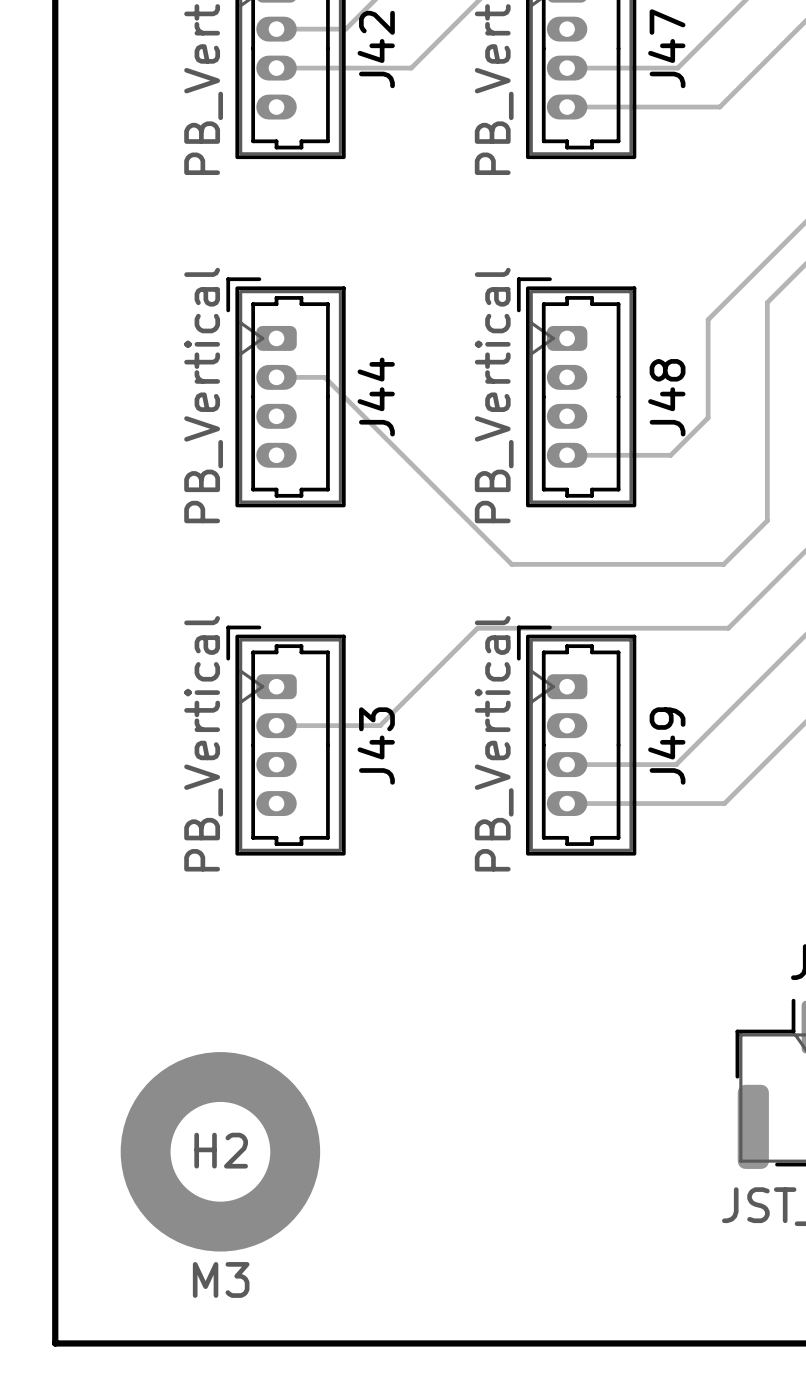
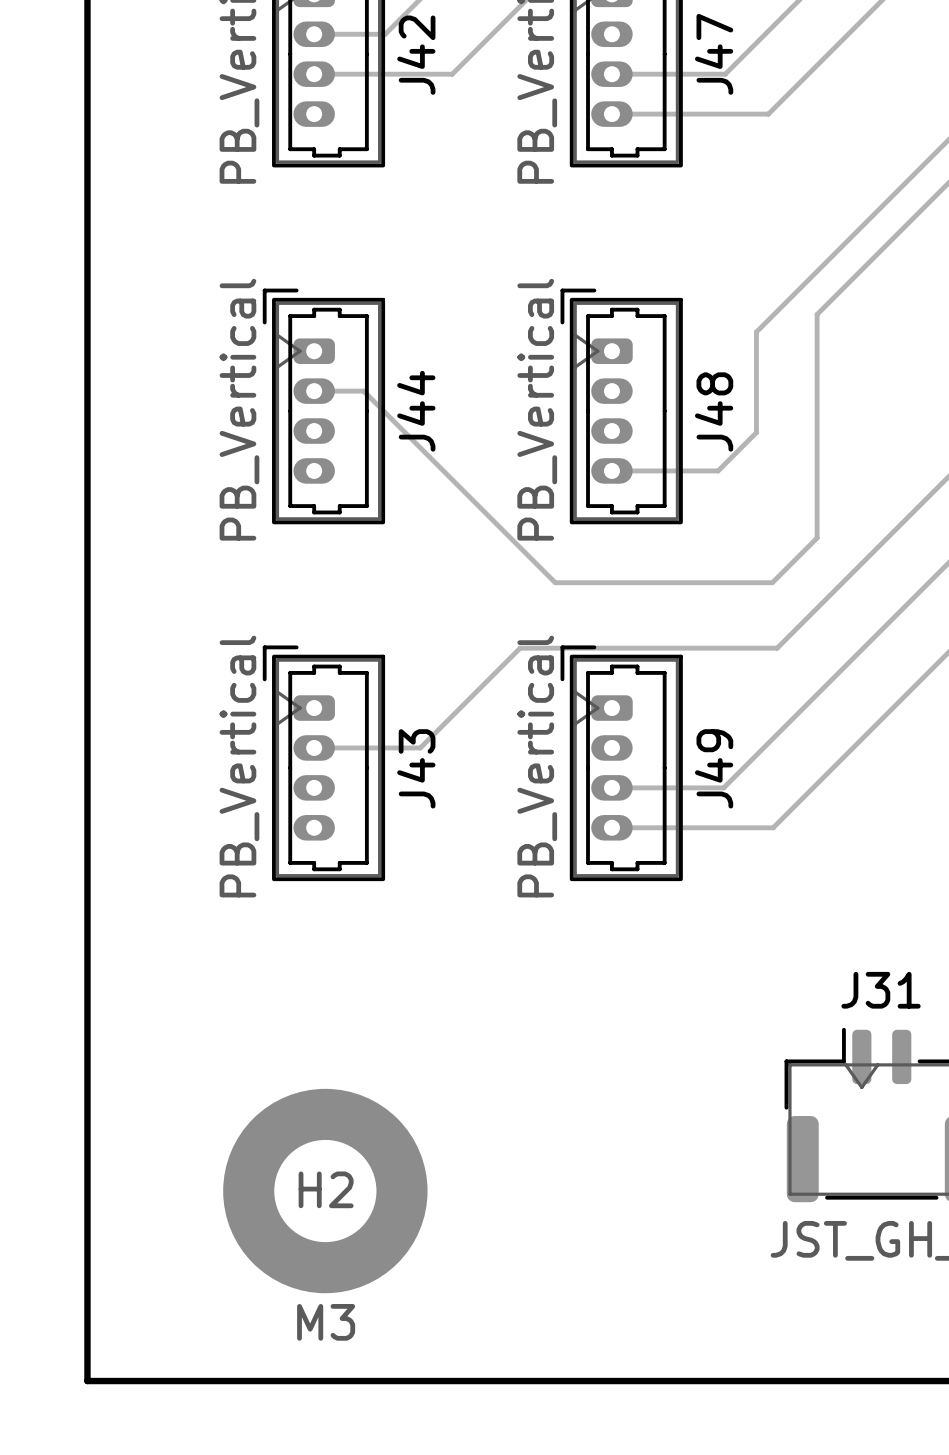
H2 position: (220, 1151) -> (325, 1191)

